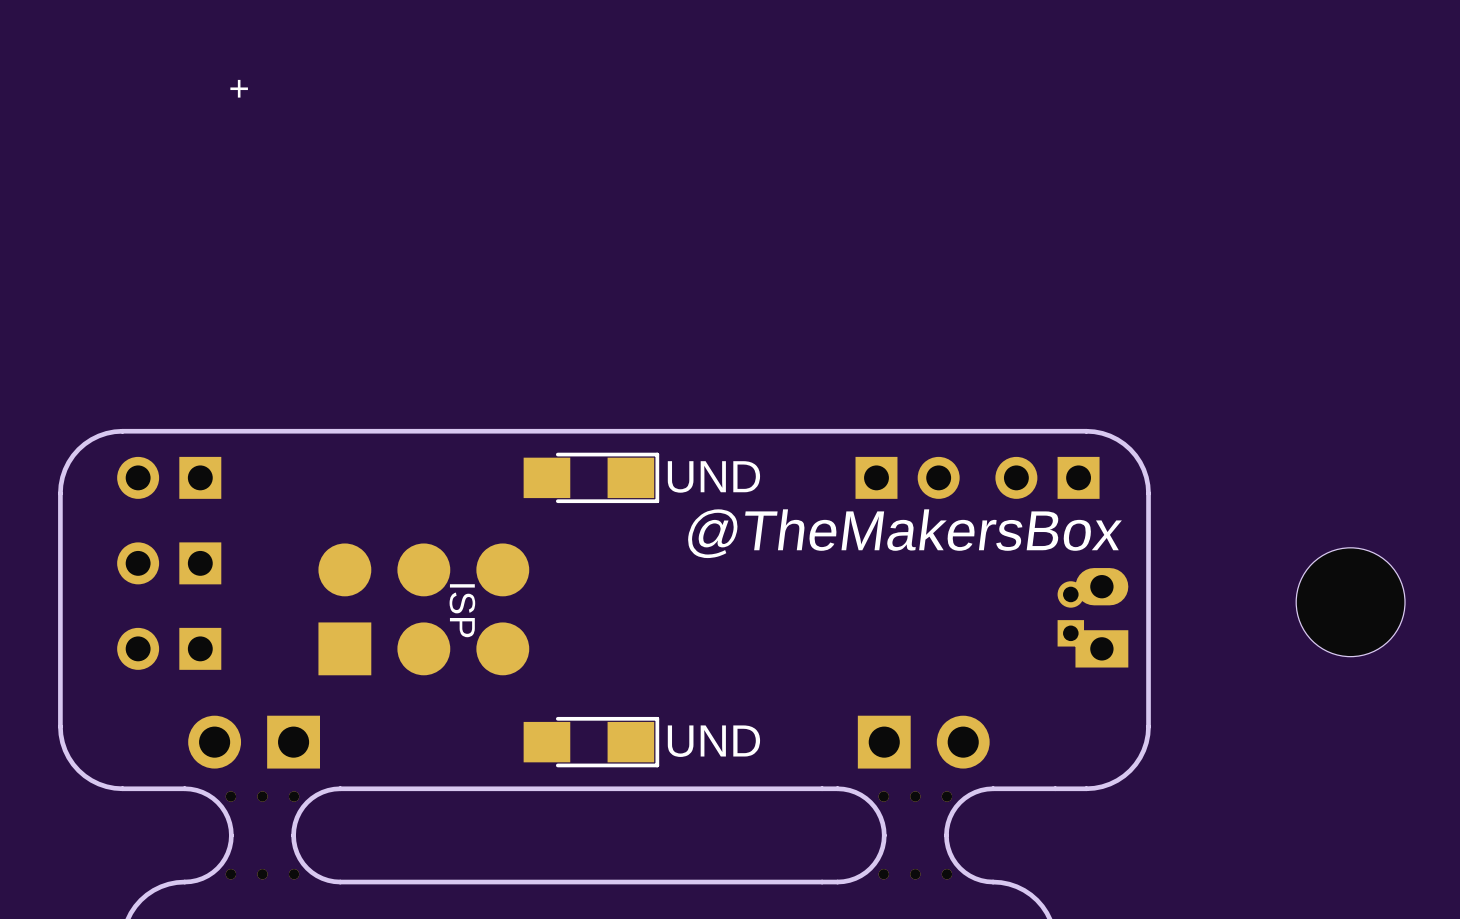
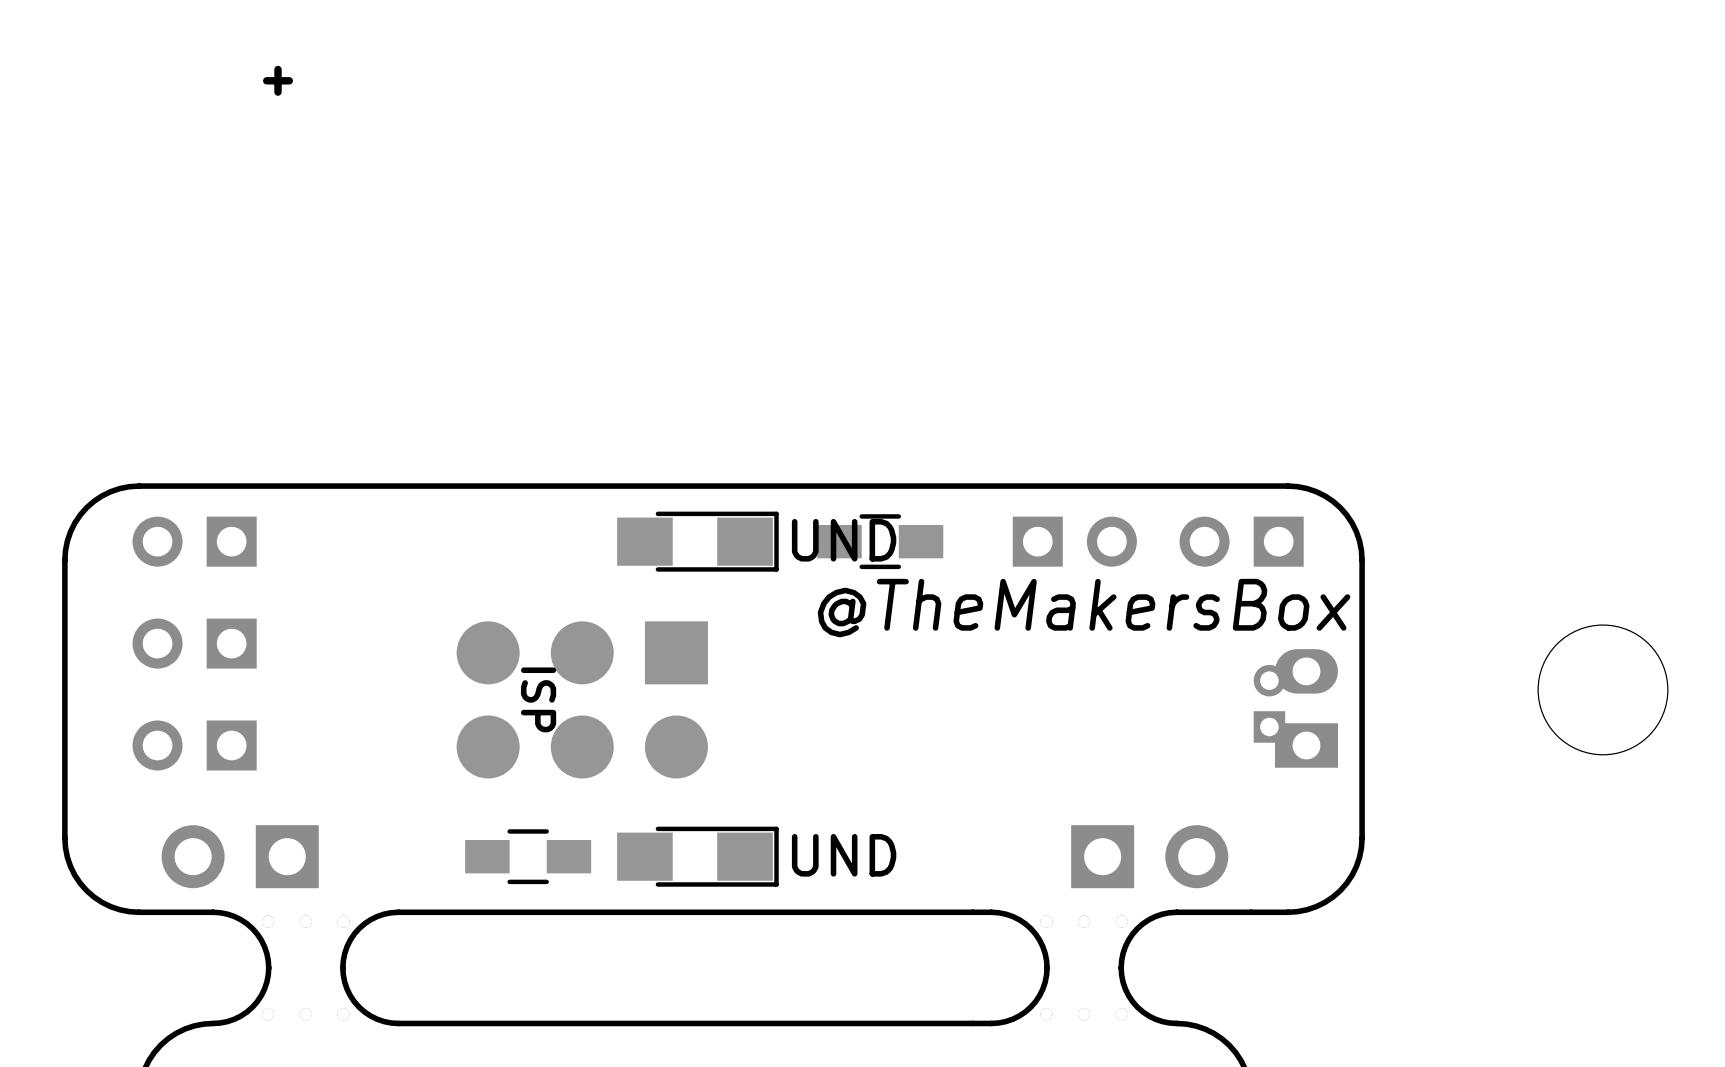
part: none -> (880, 541)
part rotation: 0° (423, 609) -> 180° (582, 699)
part position: (254, 742) -> (240, 856)
part: none -> (528, 856)
part position: (923, 742) -> (1149, 856)

